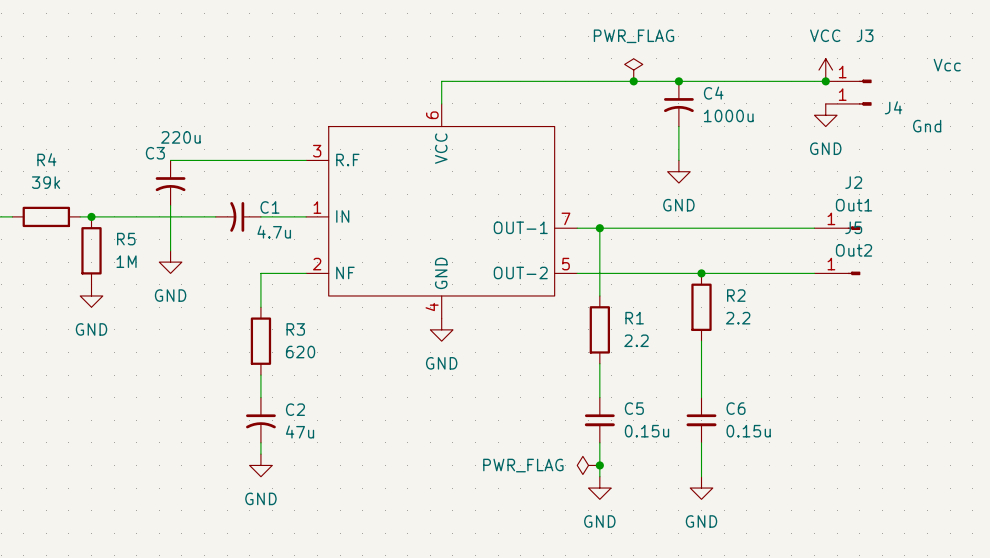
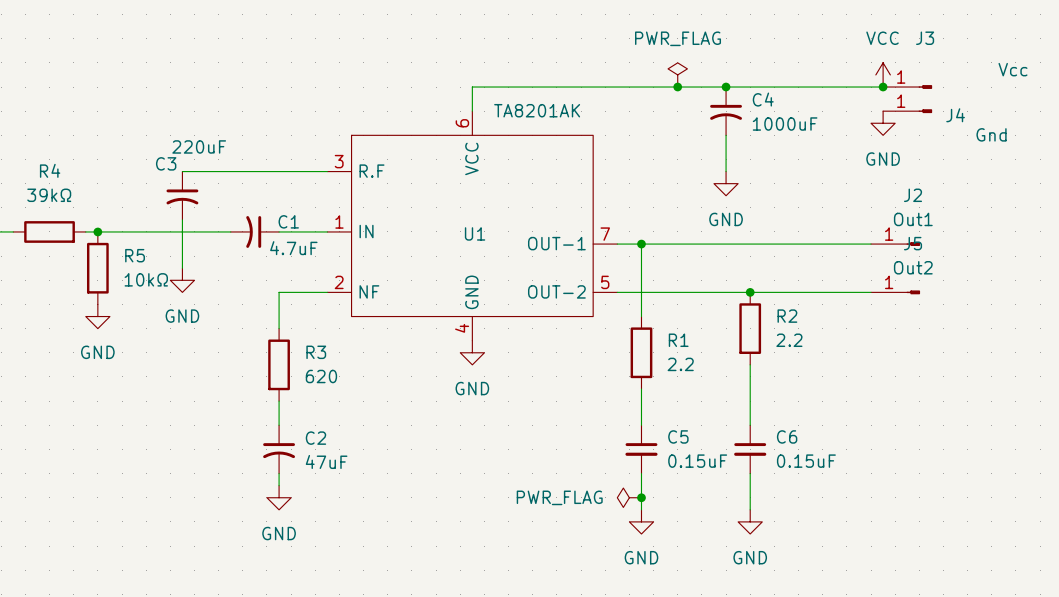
U1 value: none -> TA8201AK (537, 110)
C4 value: 1000u (728, 115) -> 1000uF (785, 124)
C3 value: 220u (180, 137) -> 220uF (199, 146)
R4 value: 39k (46, 182) -> 39kΩ (49, 195)
U1 name: none -> U1 (475, 233)
C1 value: 4.7u (274, 232) -> 4.7uF (293, 248)
R5 value: 1M (126, 261) -> 10kΩ (146, 279)
C2 value: 47u (300, 431) -> 47uF (326, 461)
C5 value: 0.15u (646, 431) -> 0.15uF (697, 461)
C6 value: 0.15u (748, 431) -> 0.15uF (806, 461)

